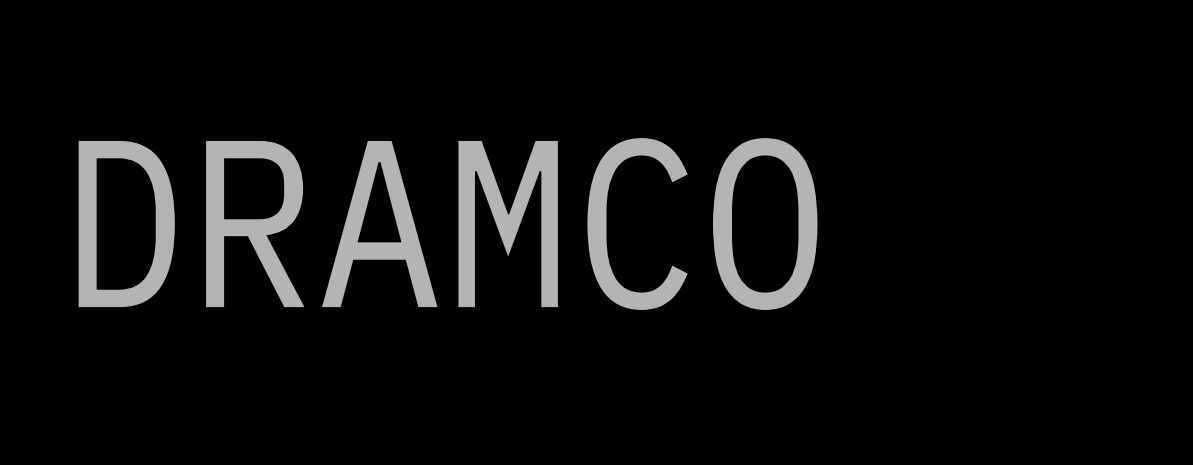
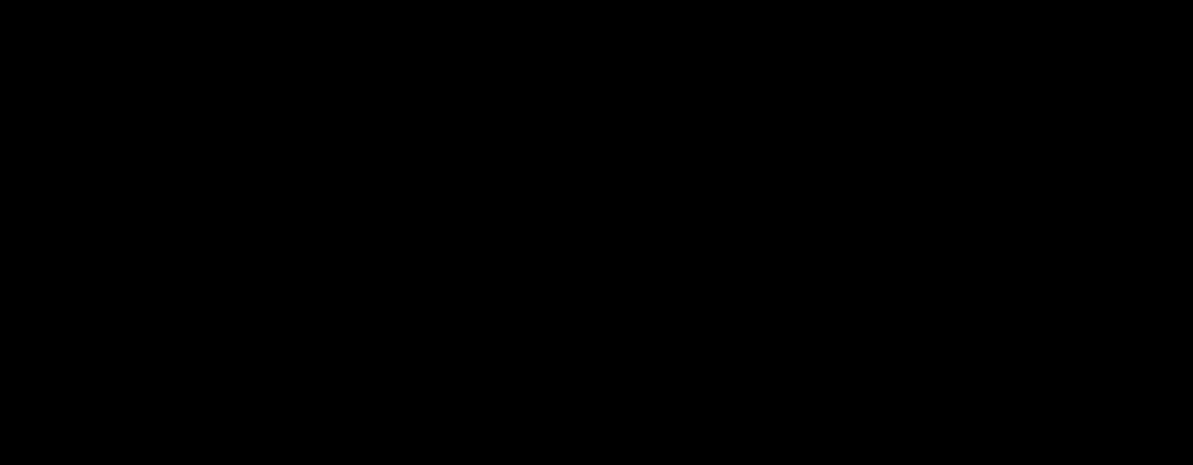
text: DRAMCO (448, 224) -> none

